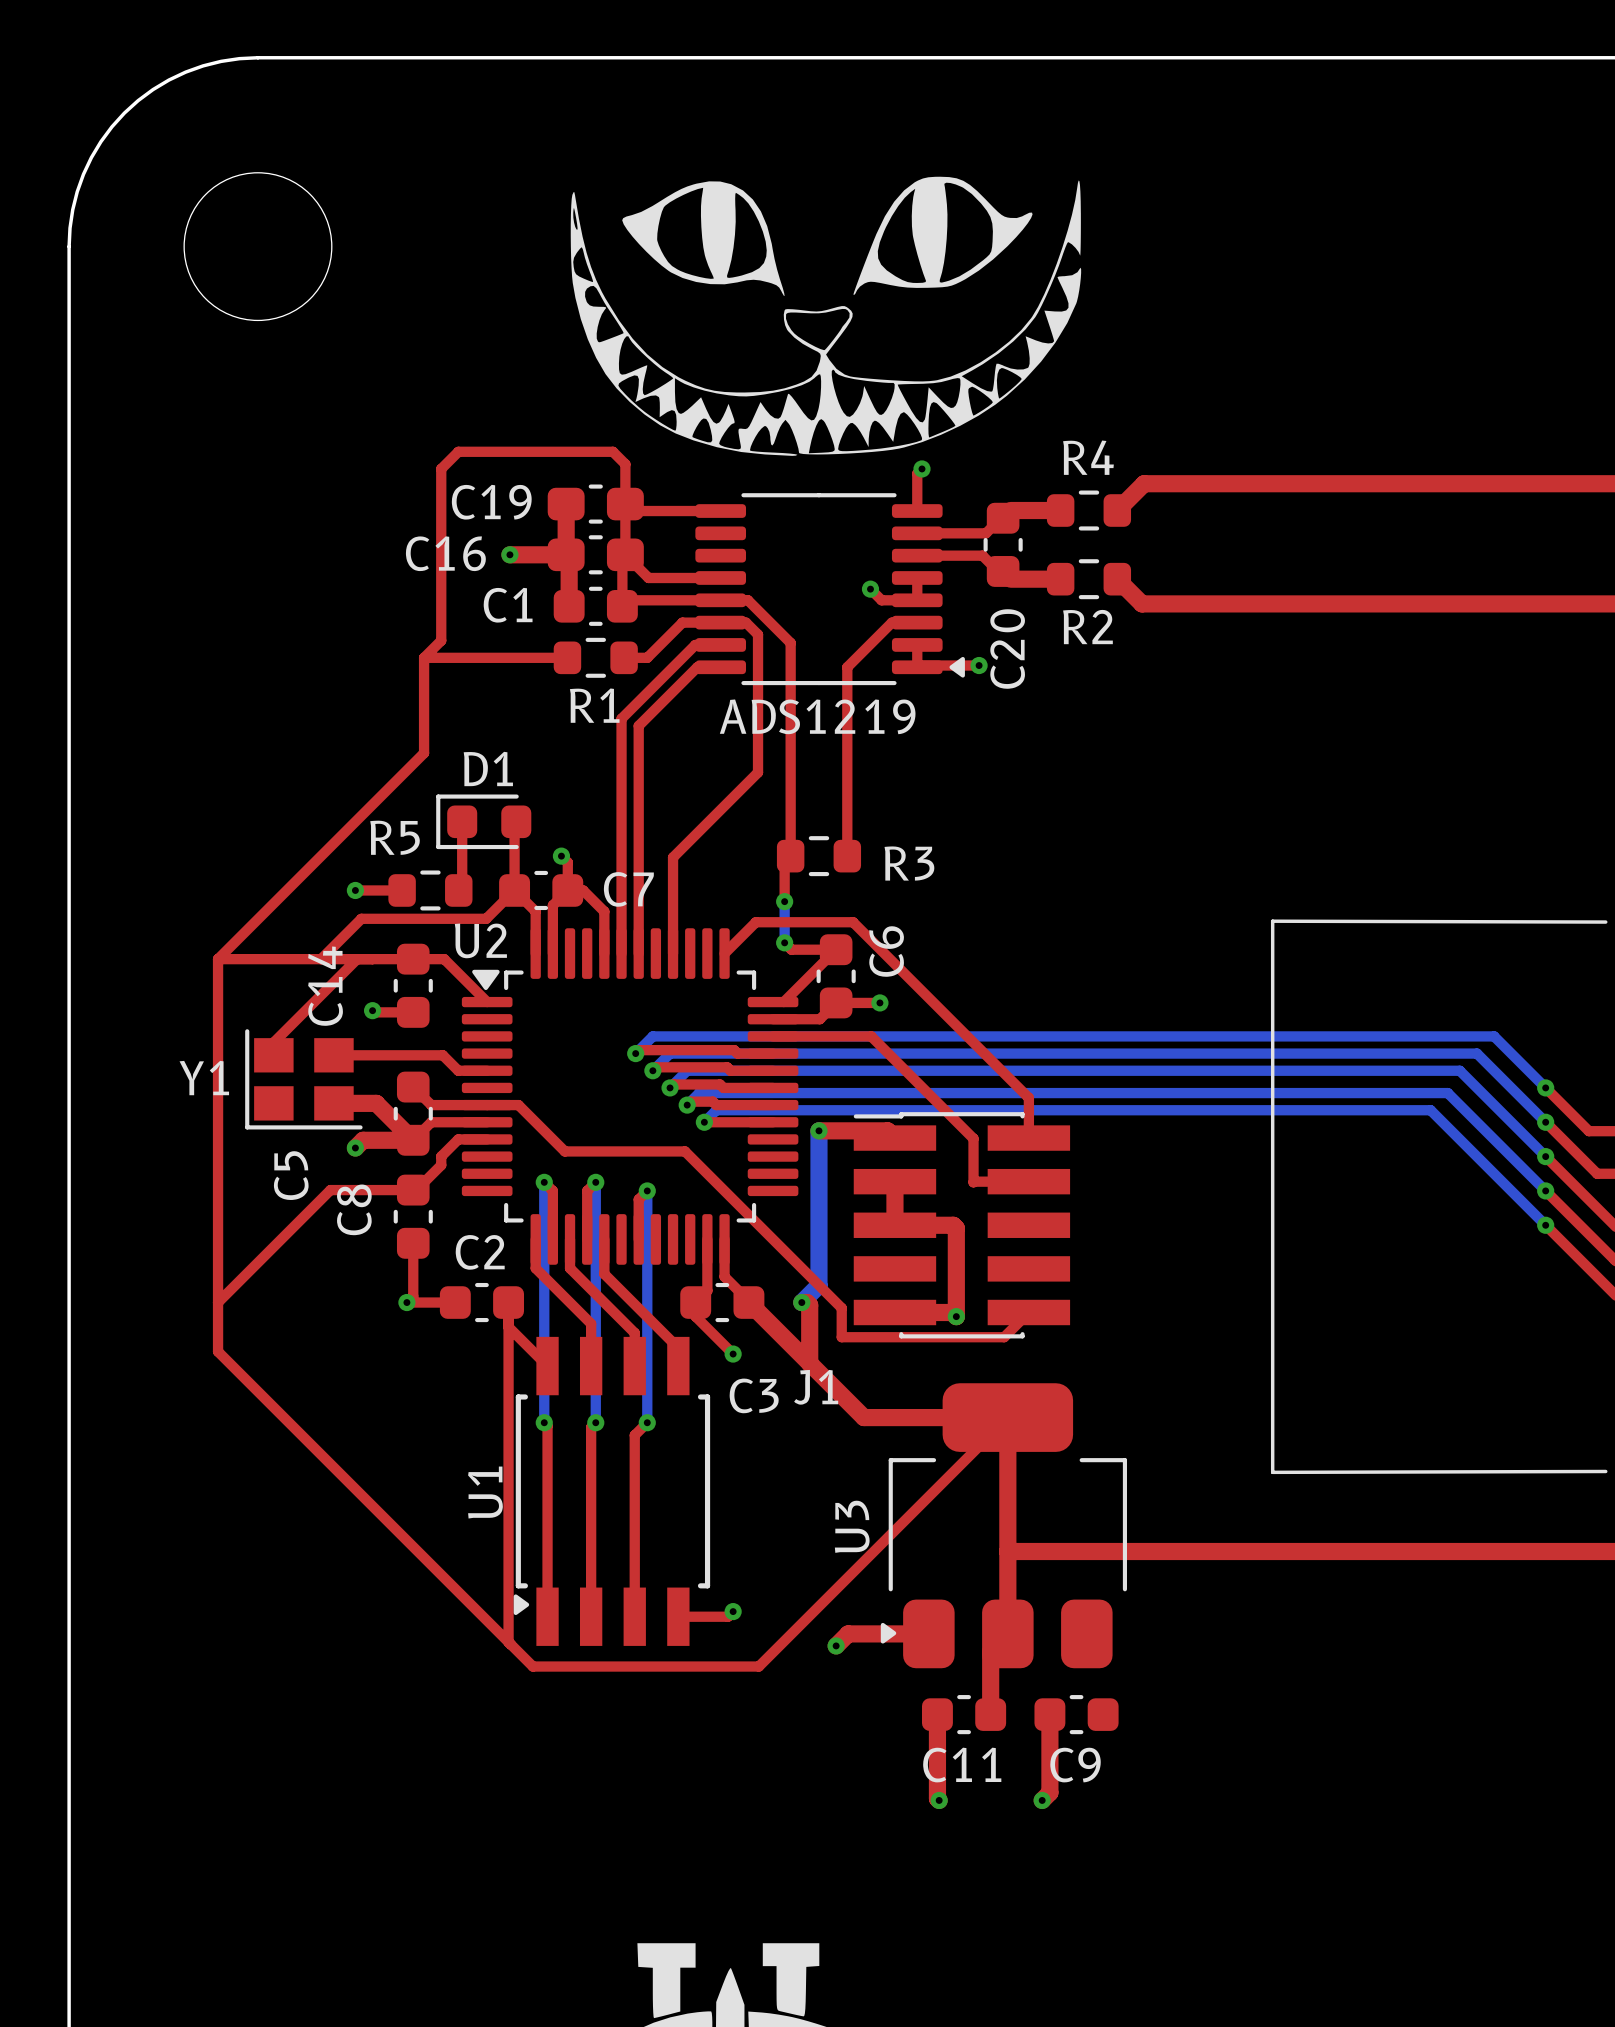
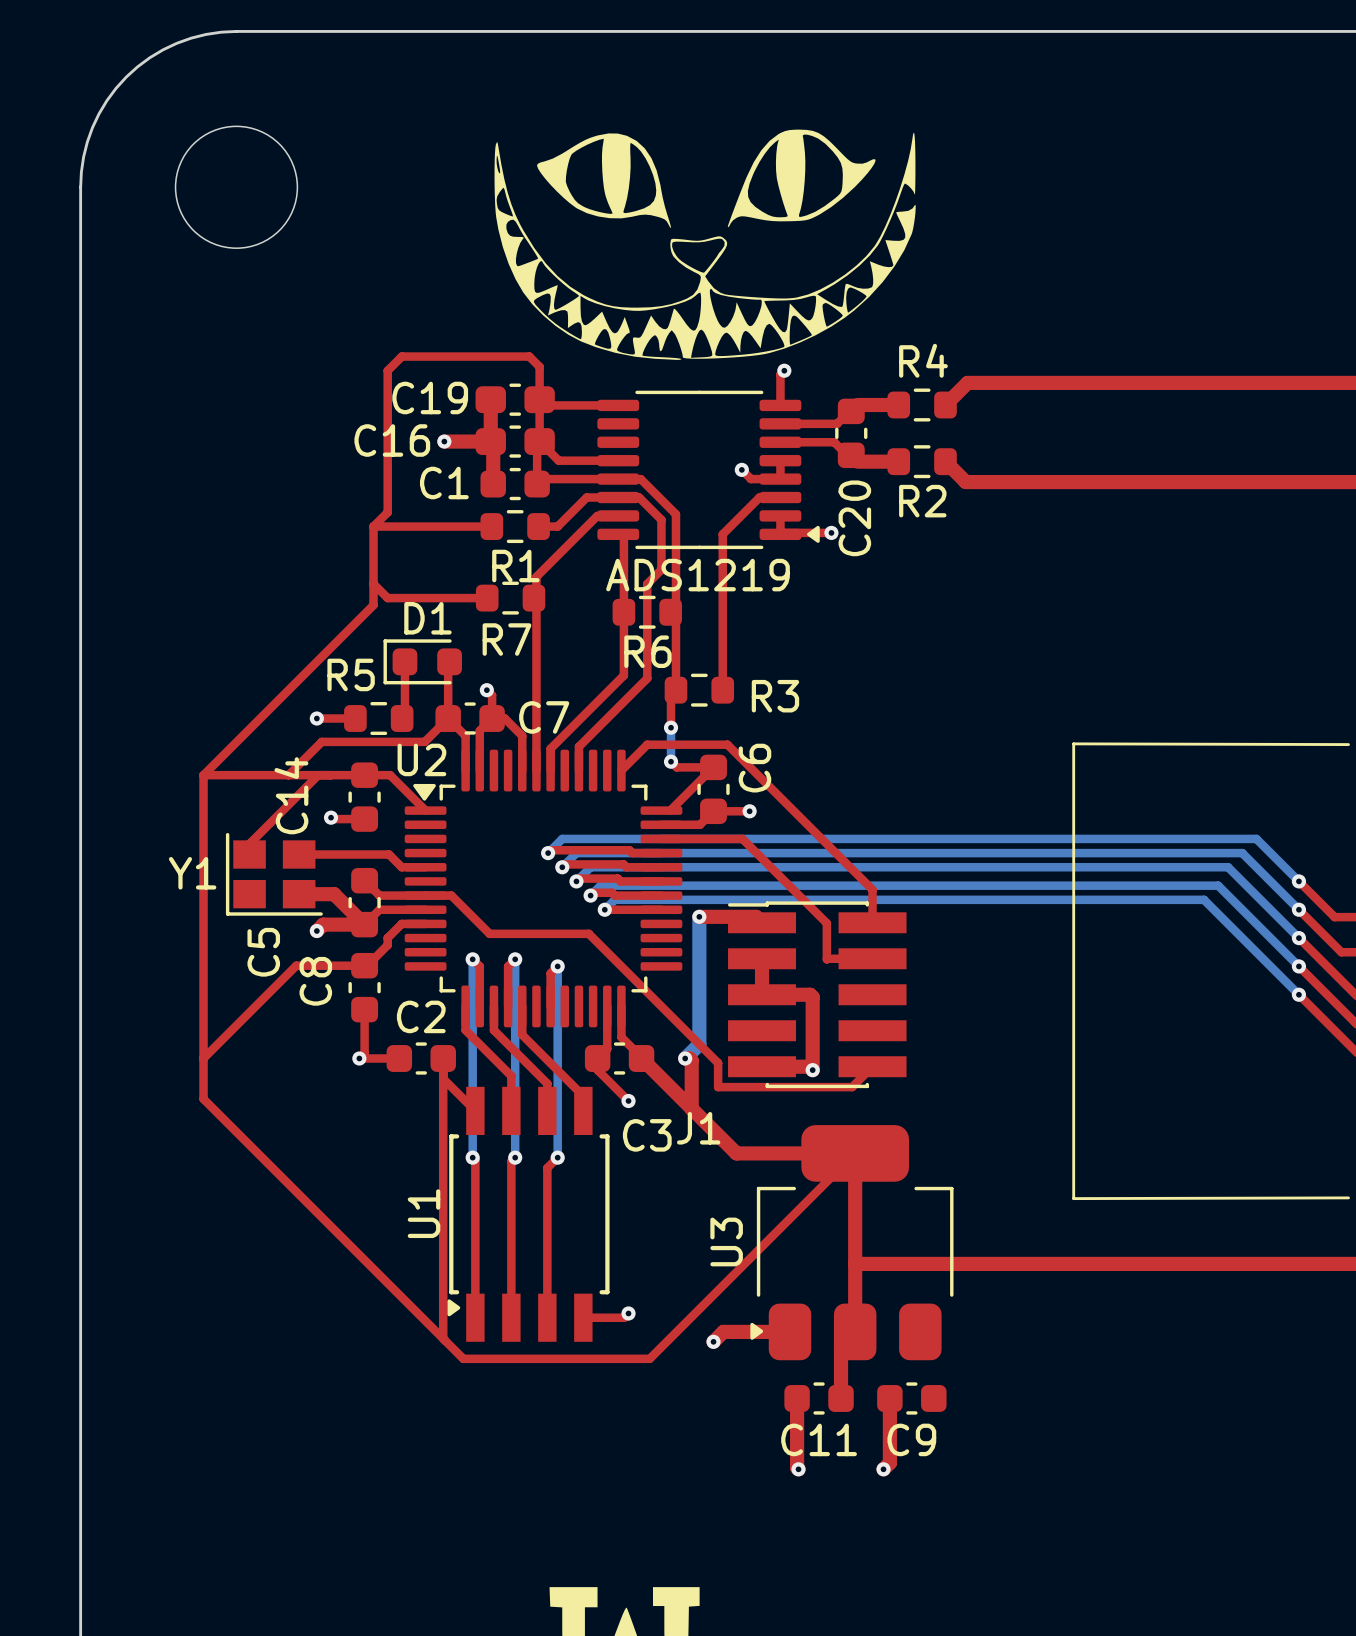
top track: (758, 634) (758, 772) (673, 857) (673, 924) -> (649, 507) (661, 519) (661, 569) (647, 583) (647, 678) (578, 746)
top track: (720, 667) (697, 667) (638, 725) (638, 927) -> (618, 534) (623, 540) (623, 675) (550, 748)
top track: none -> (373, 583) (387, 598) (487, 598)
R7: none -> (510, 598)
R6: none -> (647, 612)

